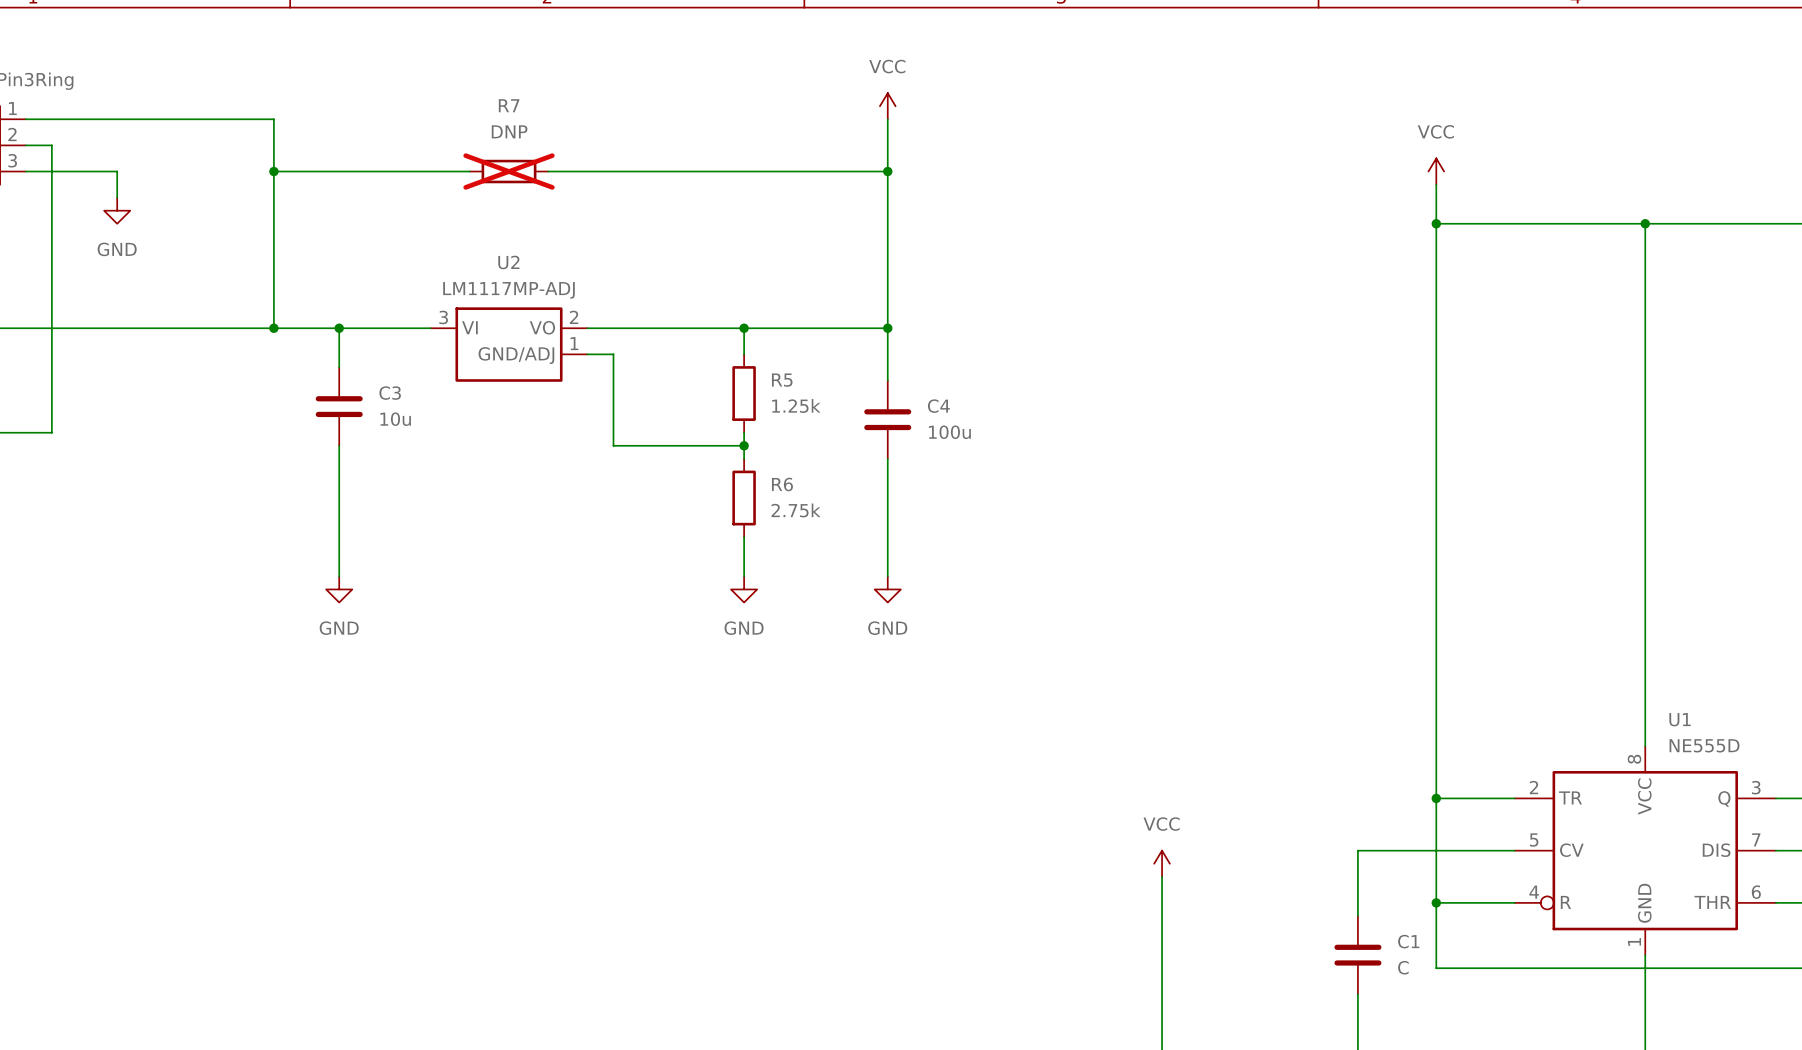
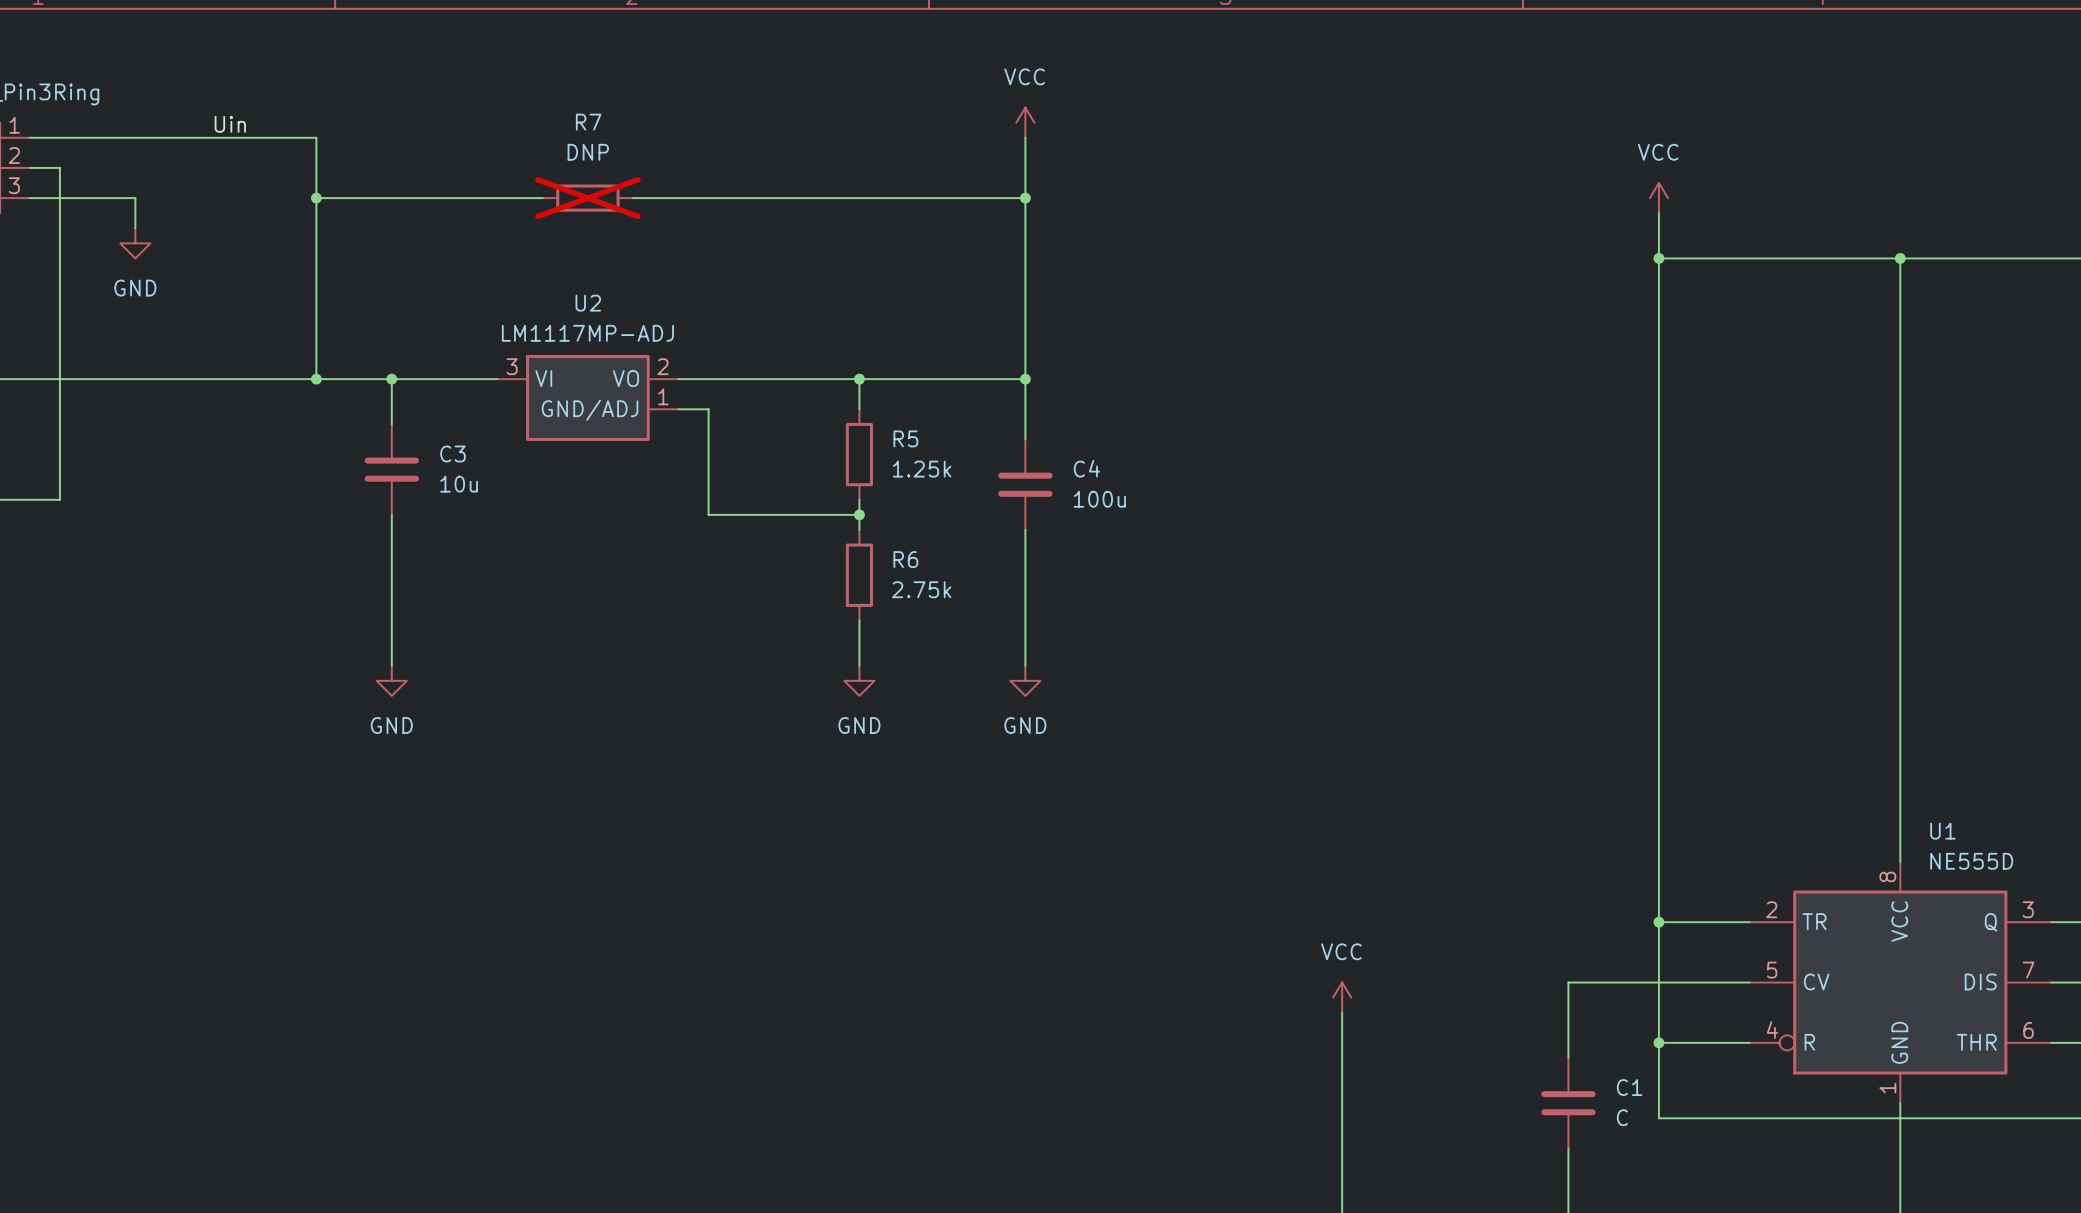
label: none -> Uin (230, 124)

